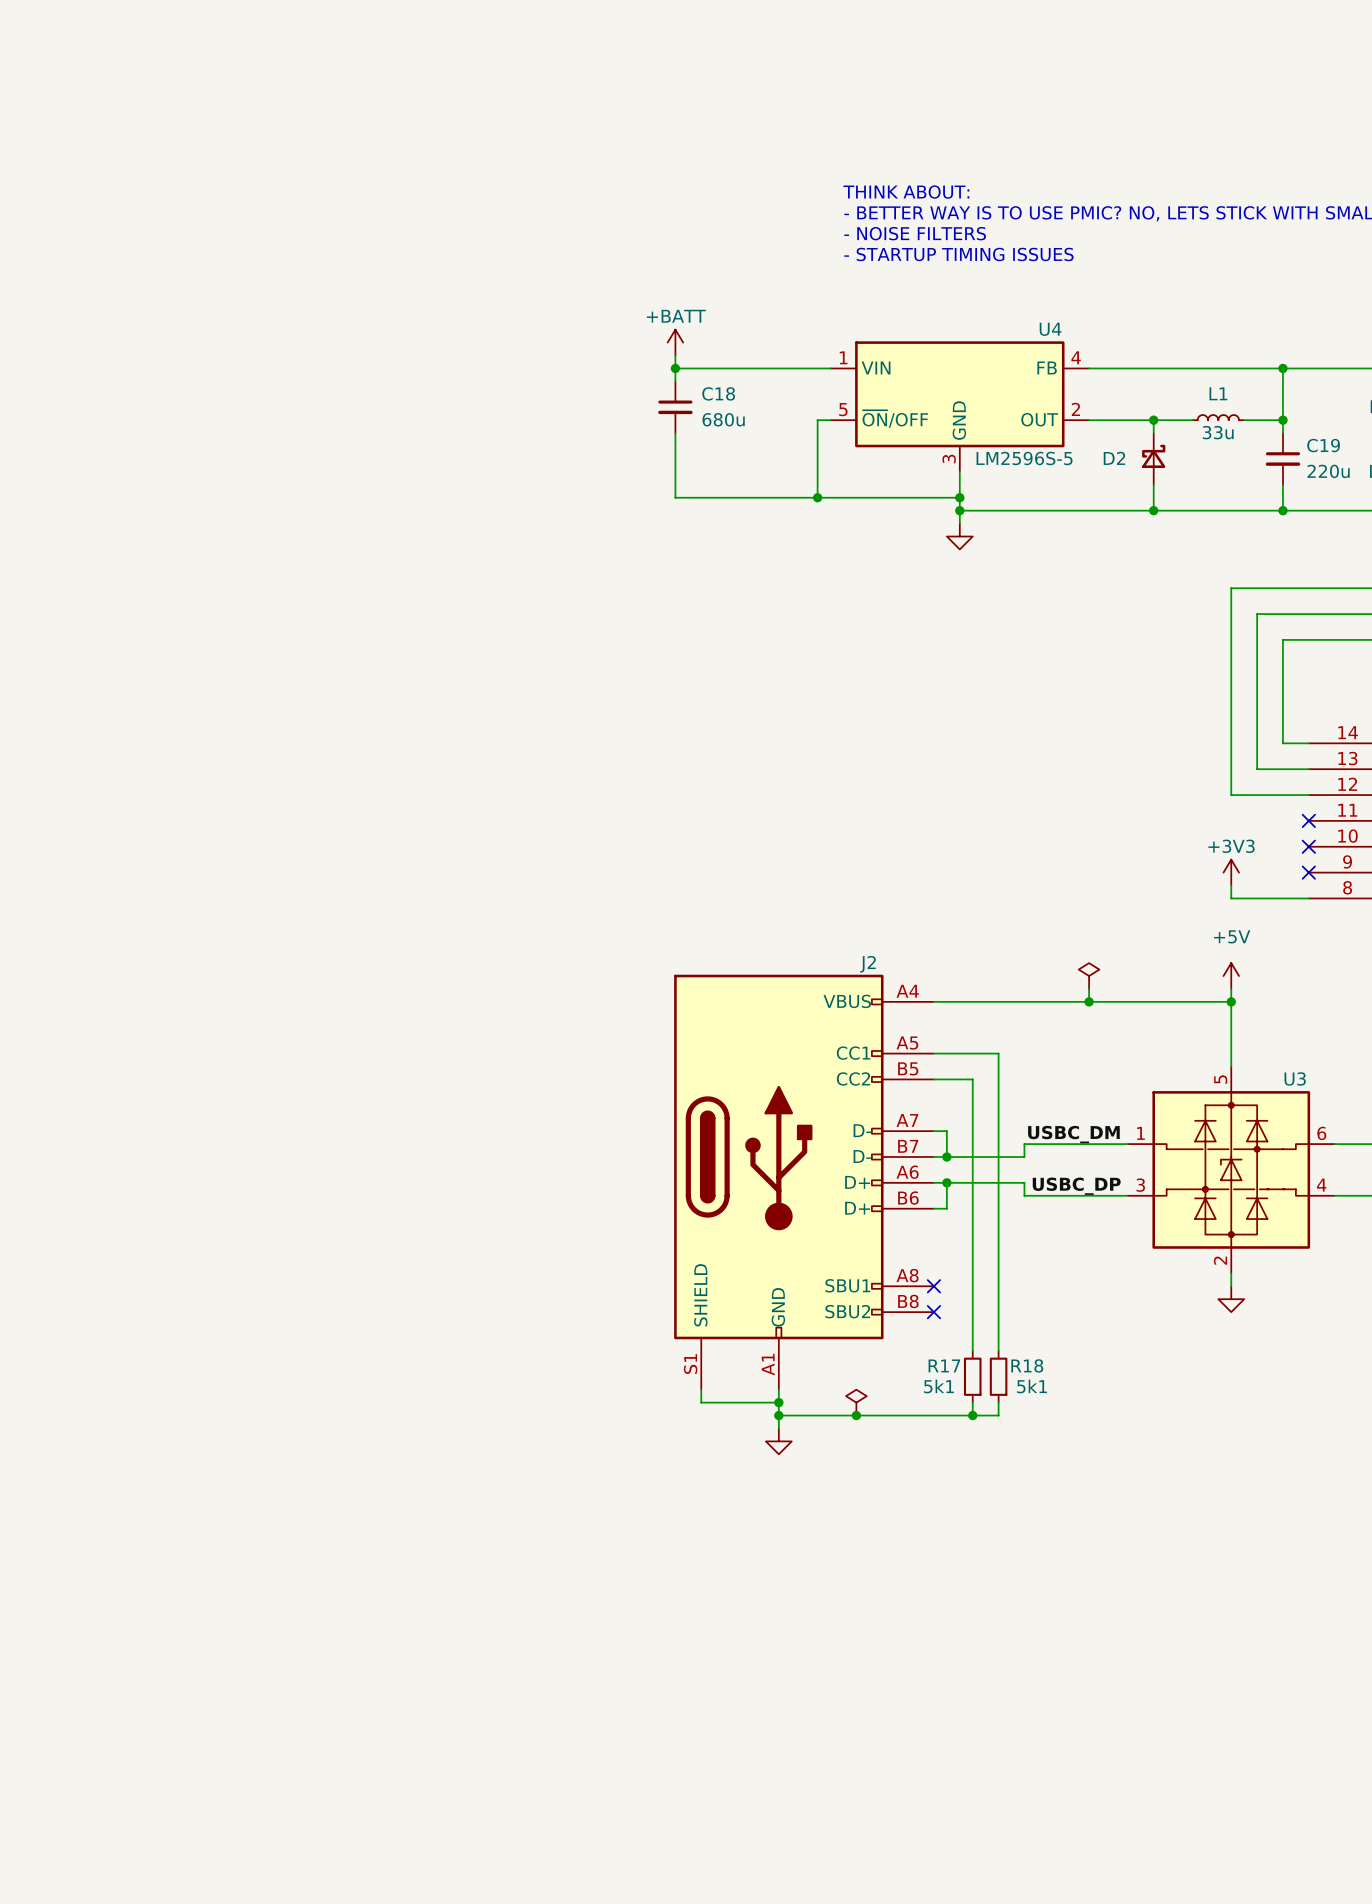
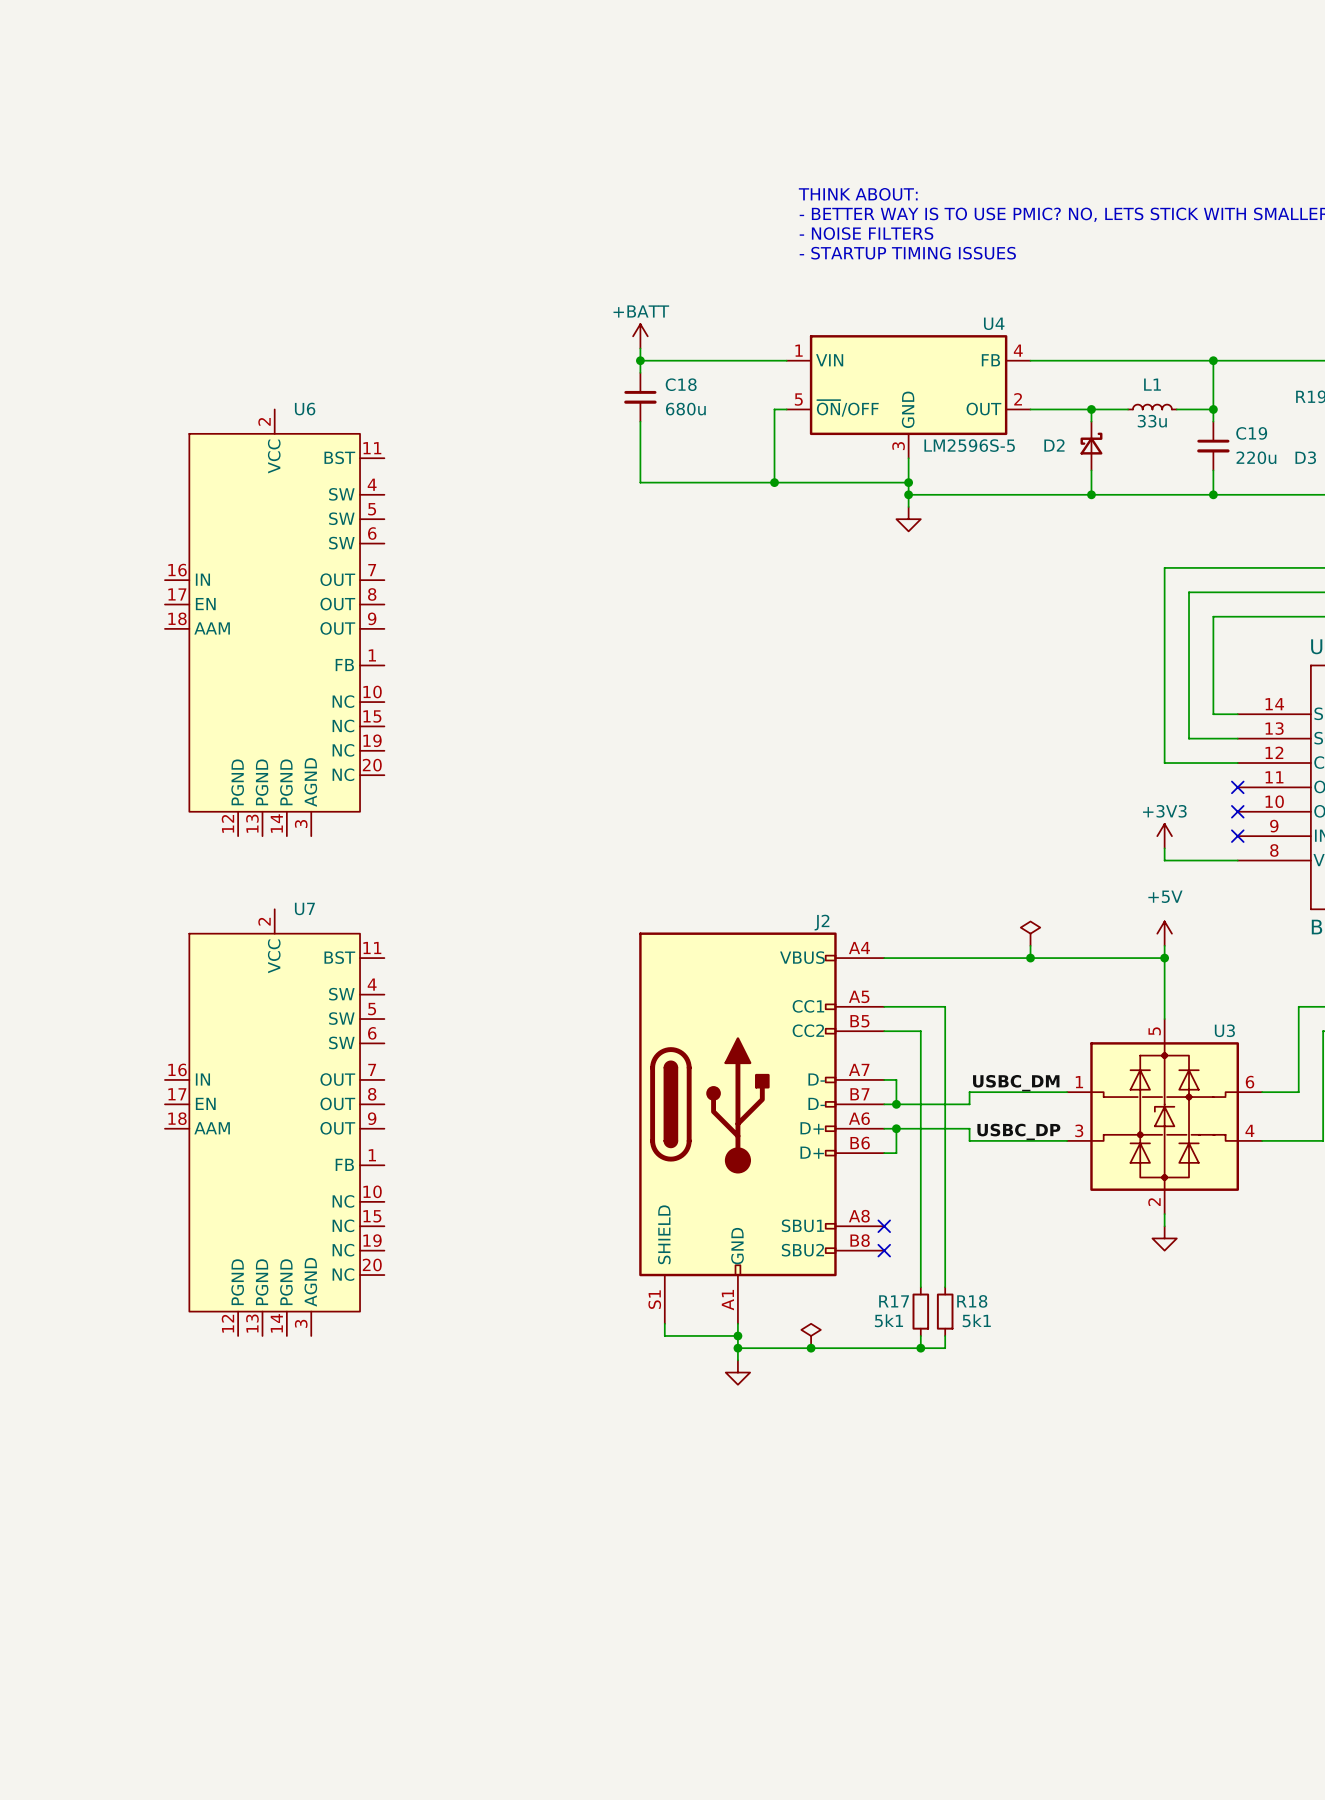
U6: none -> (274, 622)
U7: none -> (274, 1122)

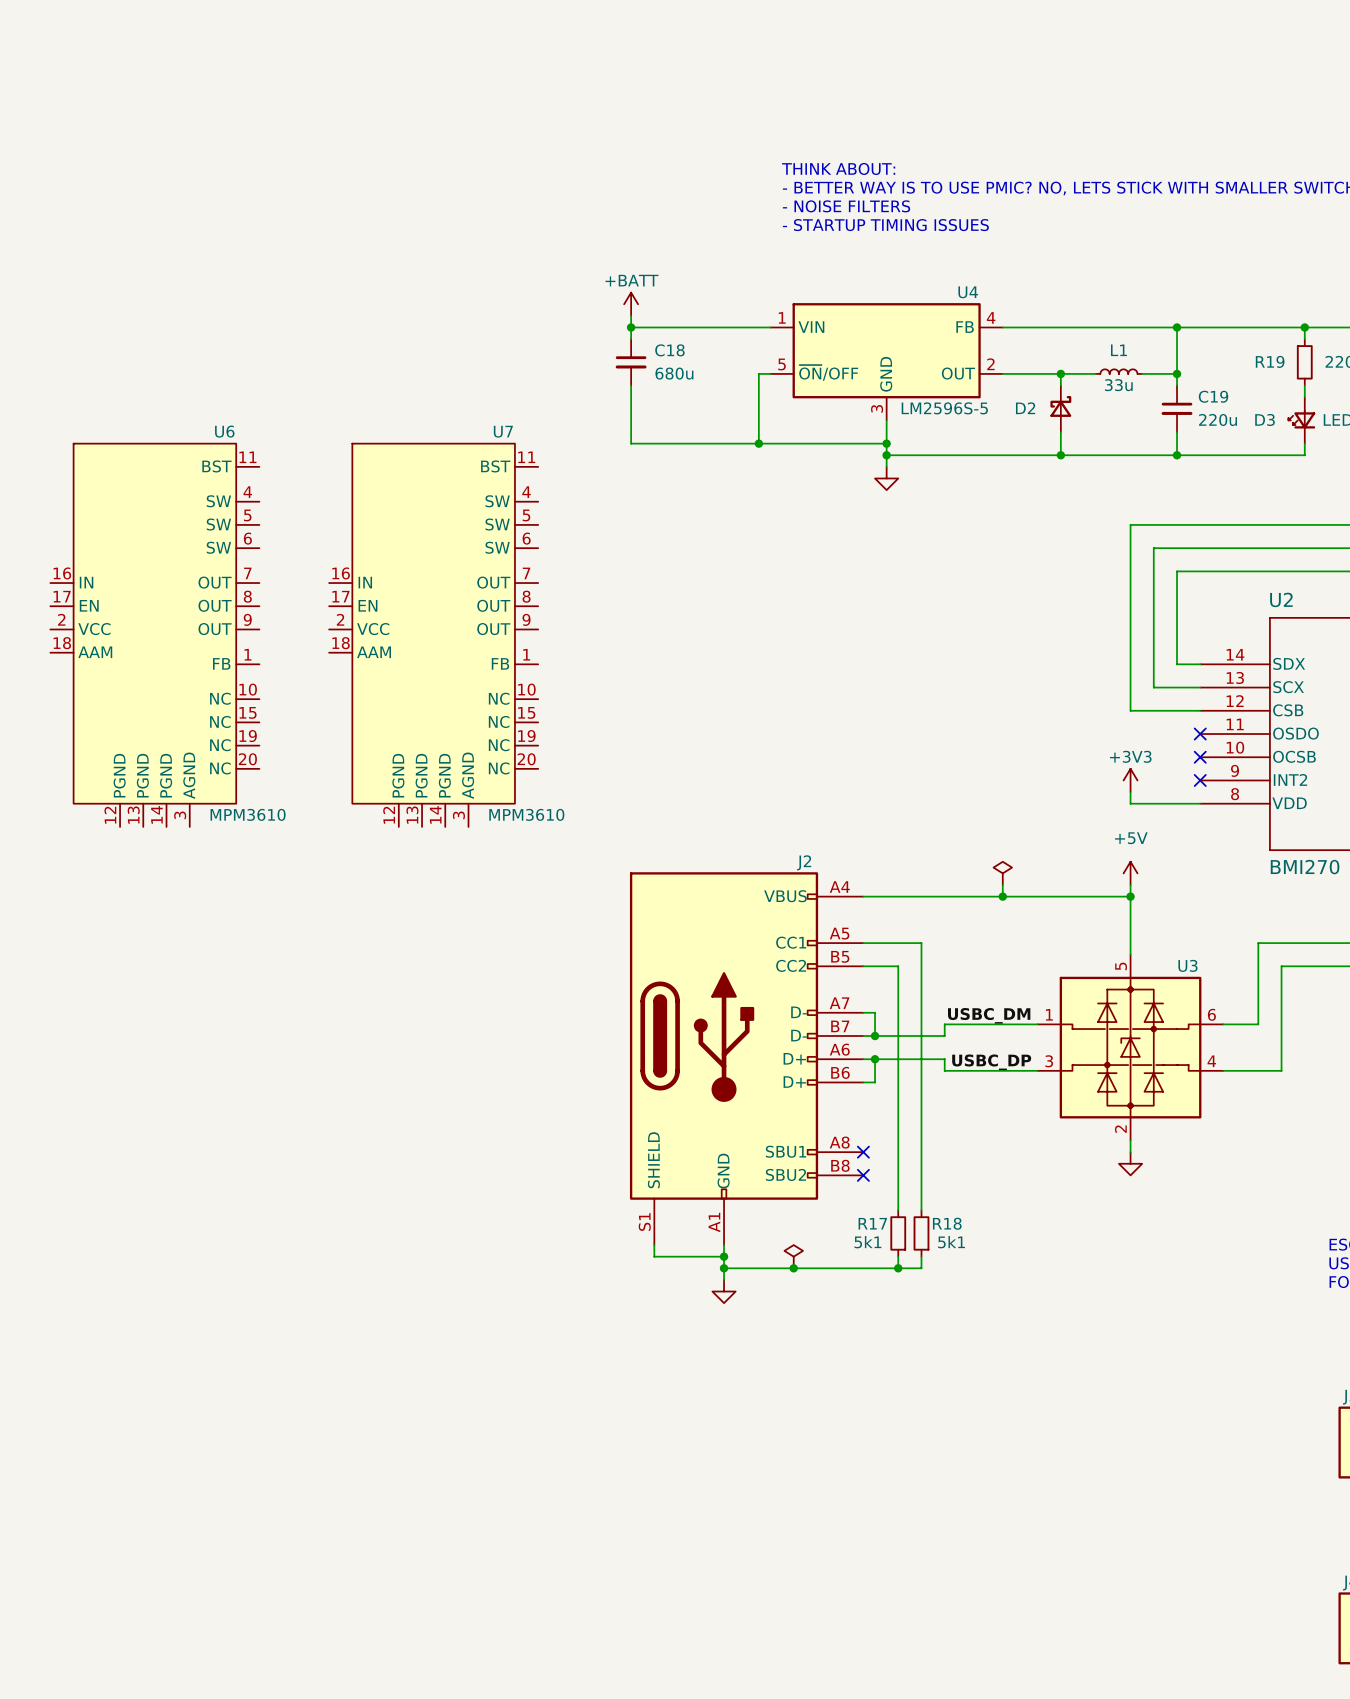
U6 symbol: [164, 409, 385, 837] -> [50, 443, 260, 827]
U6 name position: U6 (305, 409) -> U6 (224, 431)
U6 value: none -> MPM3610 (248, 814)
U7 value: none -> MPM3610 (526, 814)
U7 name position: U7 (304, 908) -> U7 (503, 431)
U7 symbol: [164, 909, 385, 1336] -> [329, 443, 539, 827]

